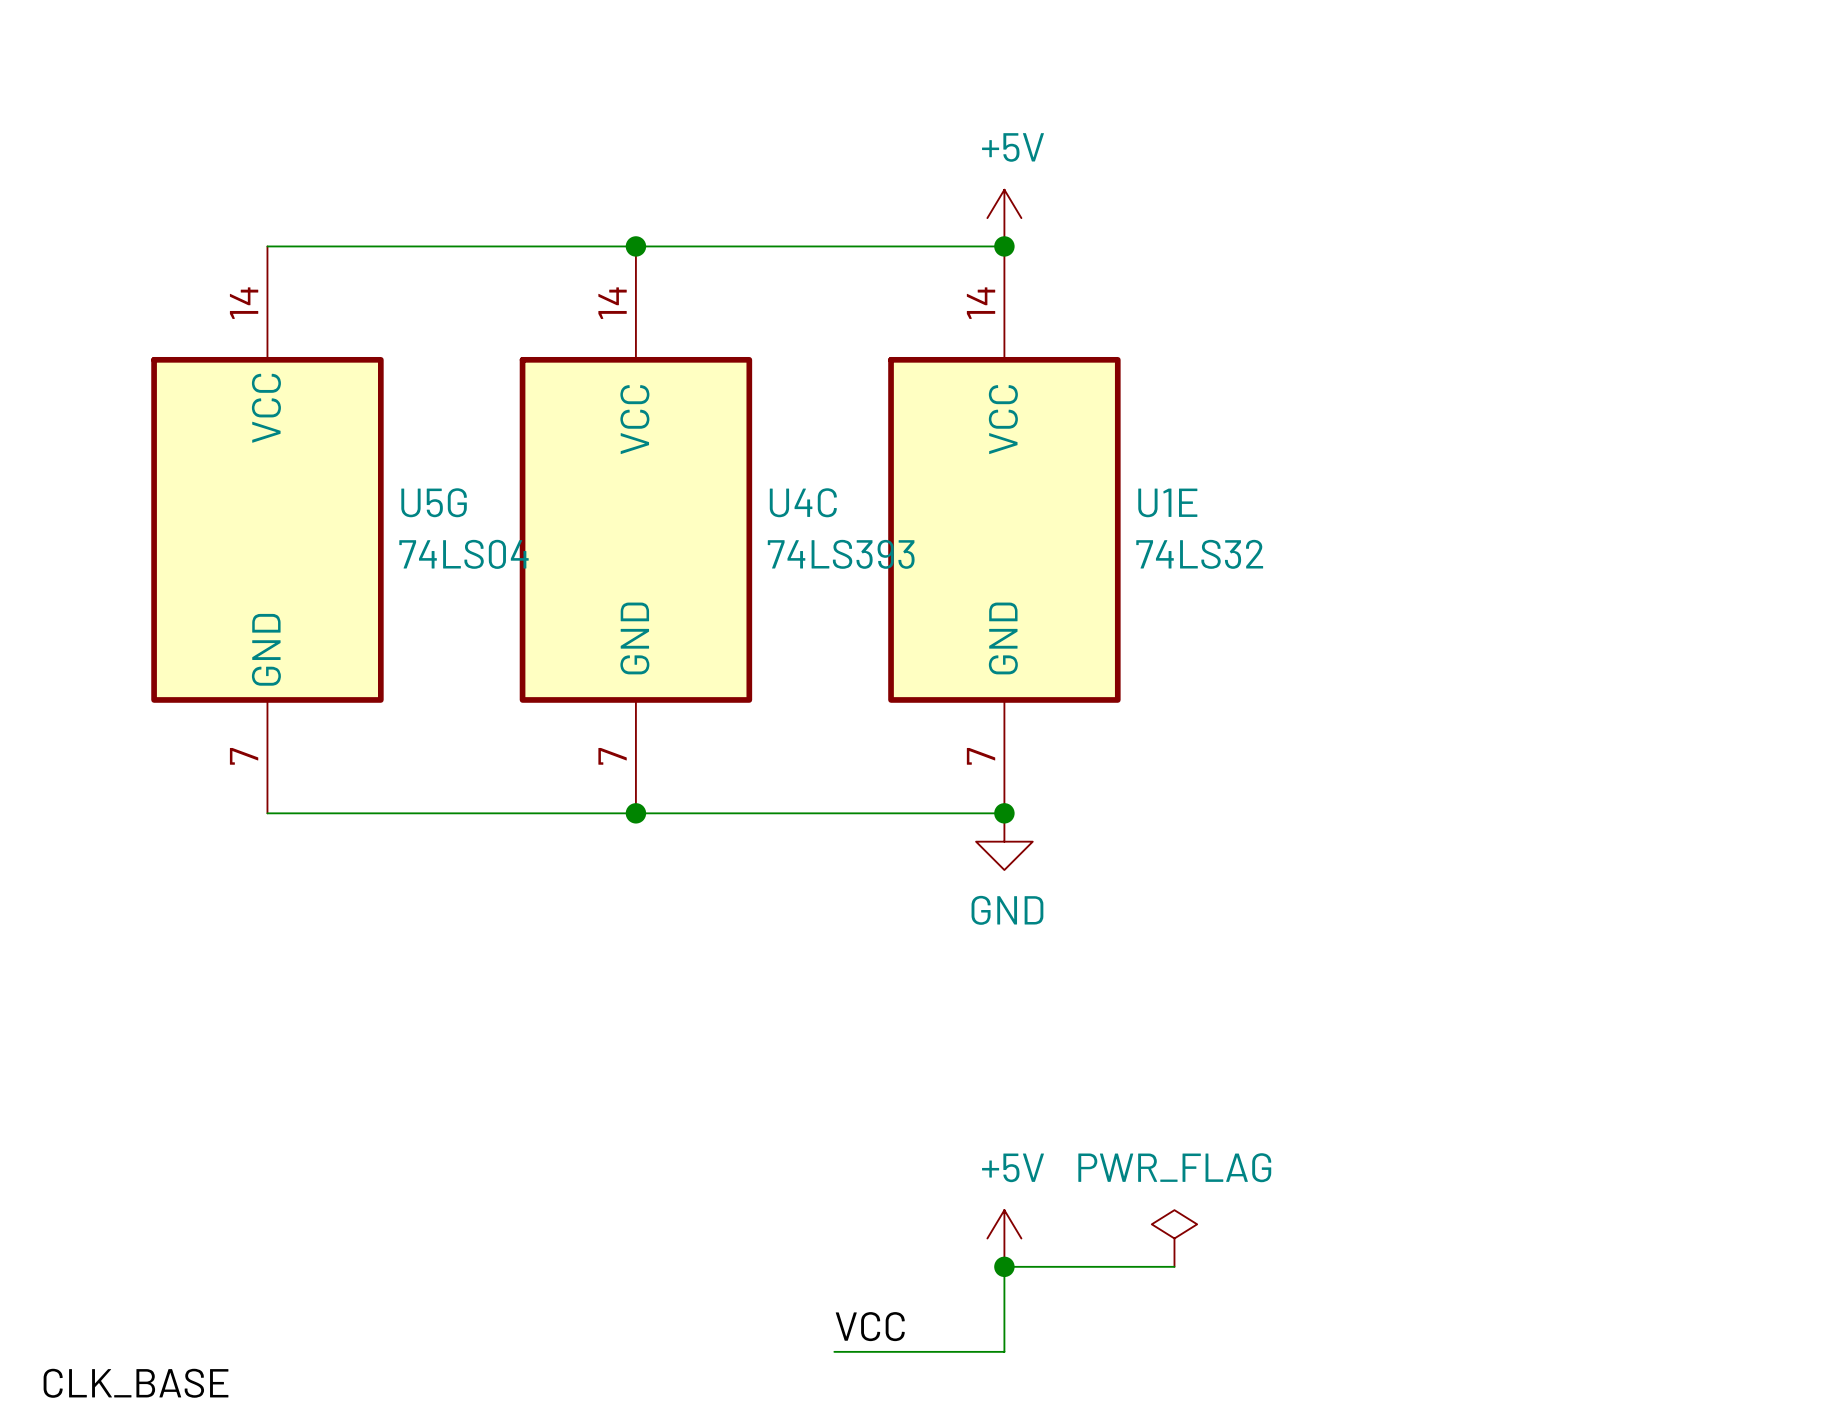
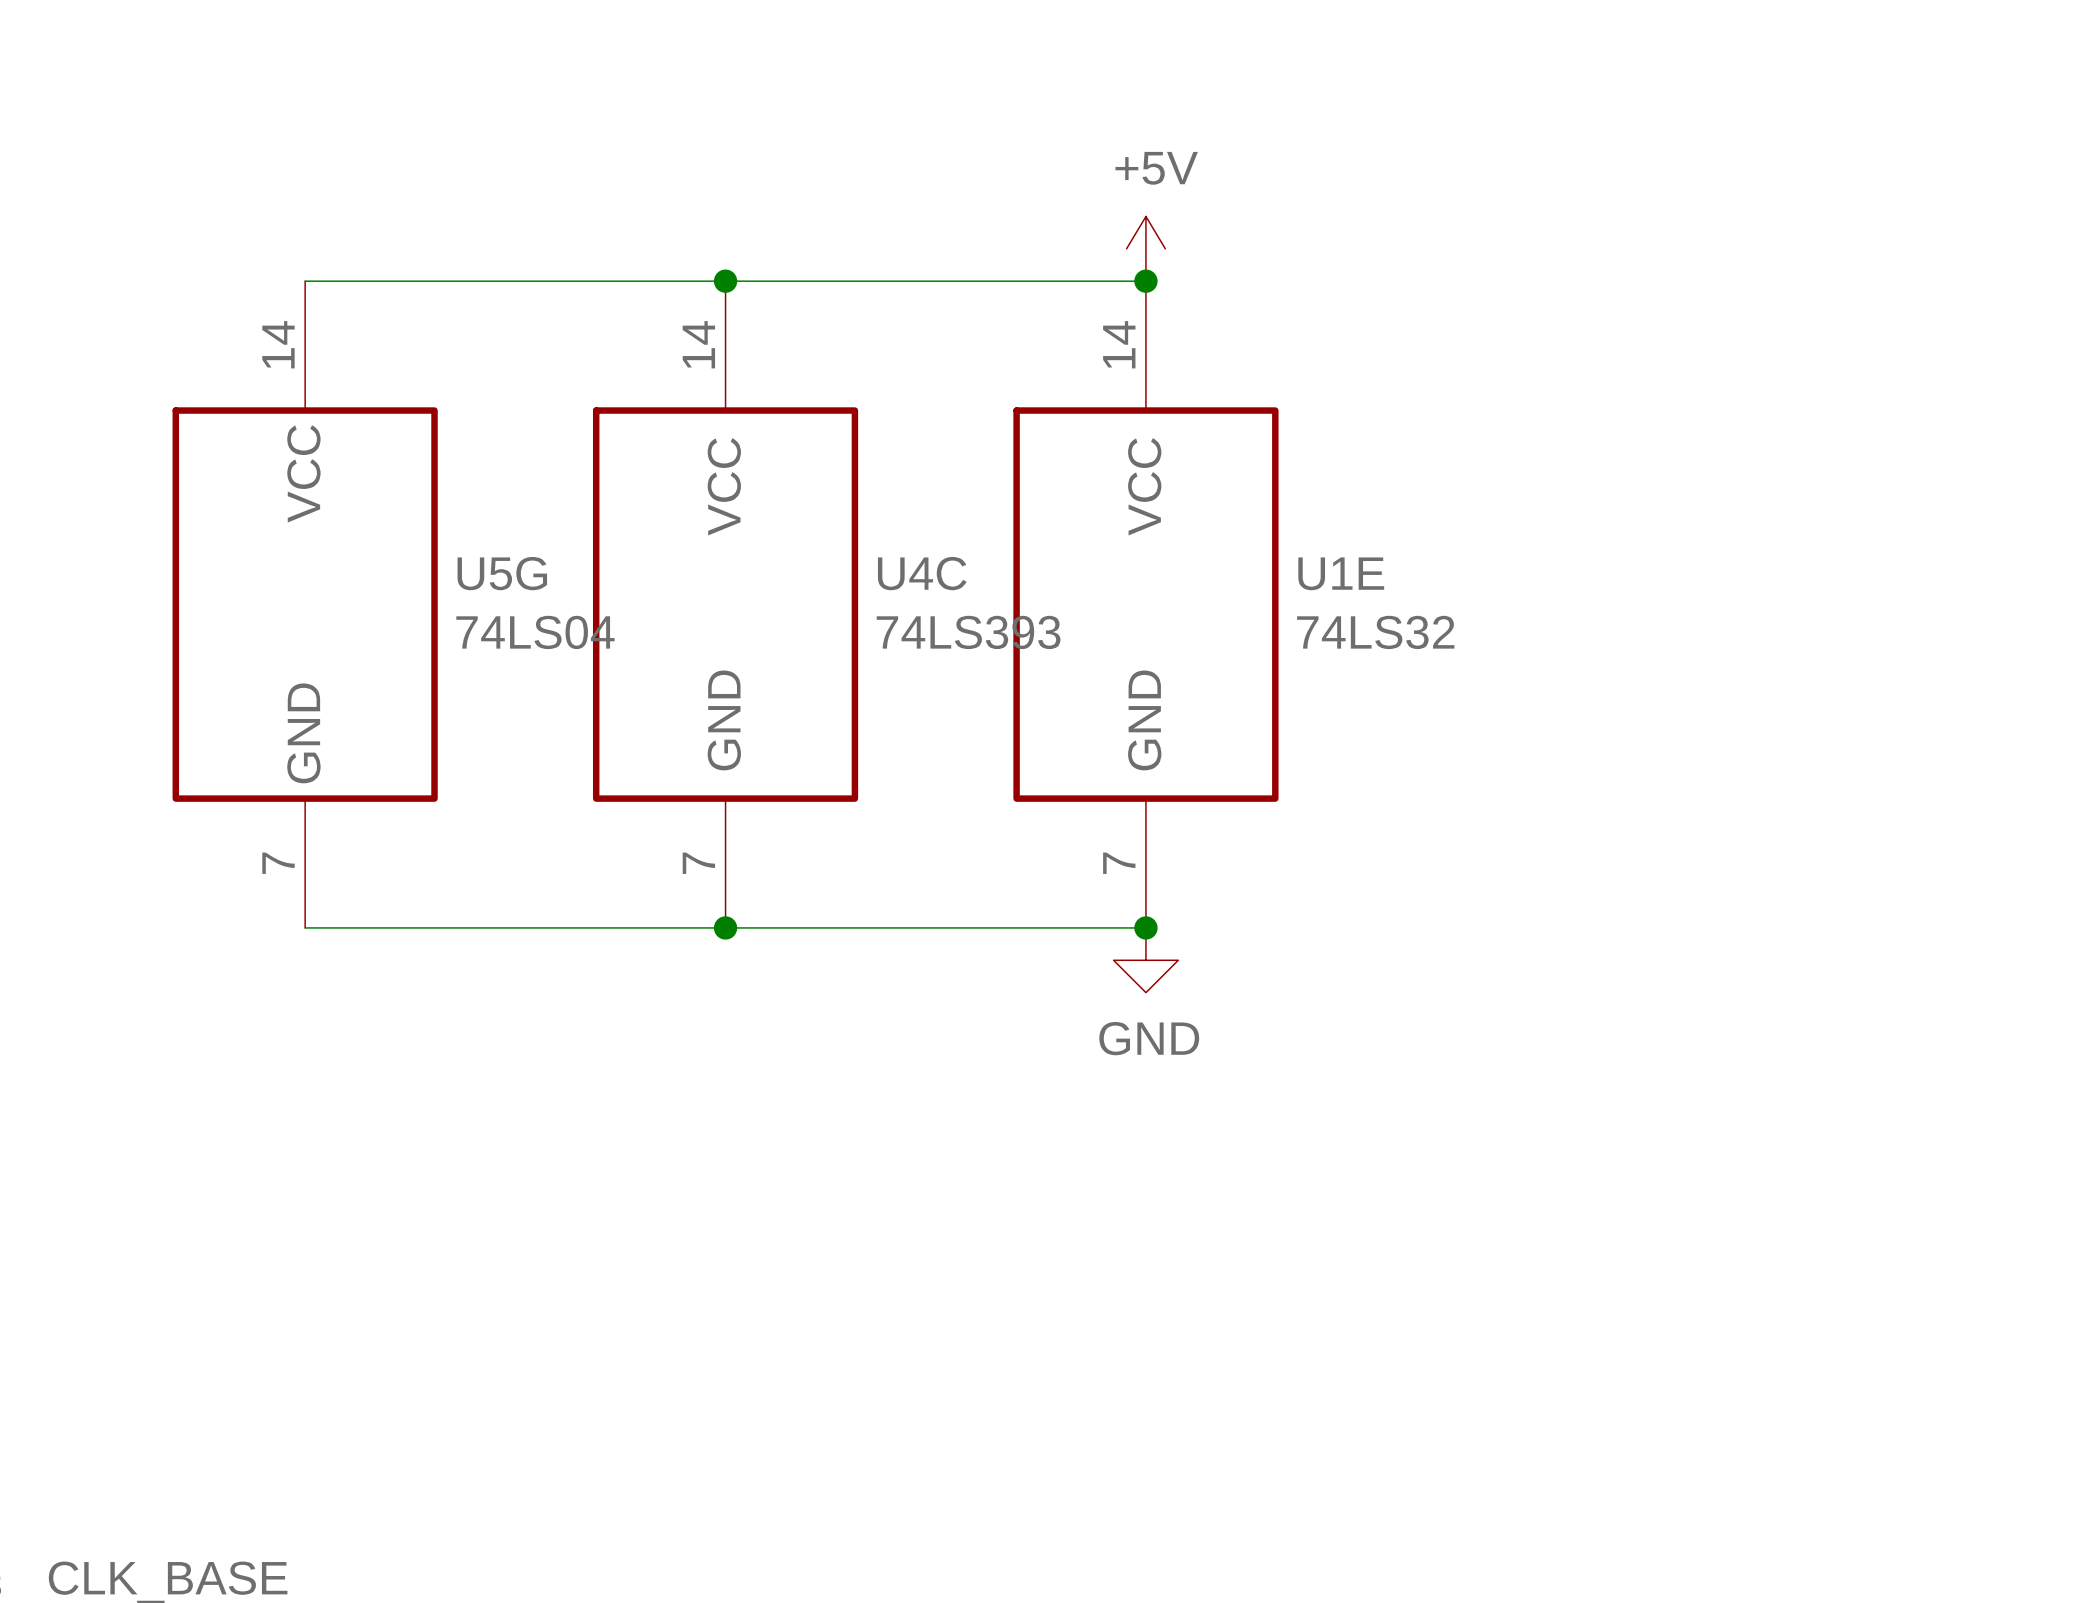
power symbol: +5V (1004, 1238) -> none
power symbol: PWR_FLAG (1174, 1238) -> none
junction: (1004, 1266) -> none
wire: (1174, 1266) (1004, 1266) (1004, 1351) (834, 1351) -> none
label: VCC (870, 1326) -> none

